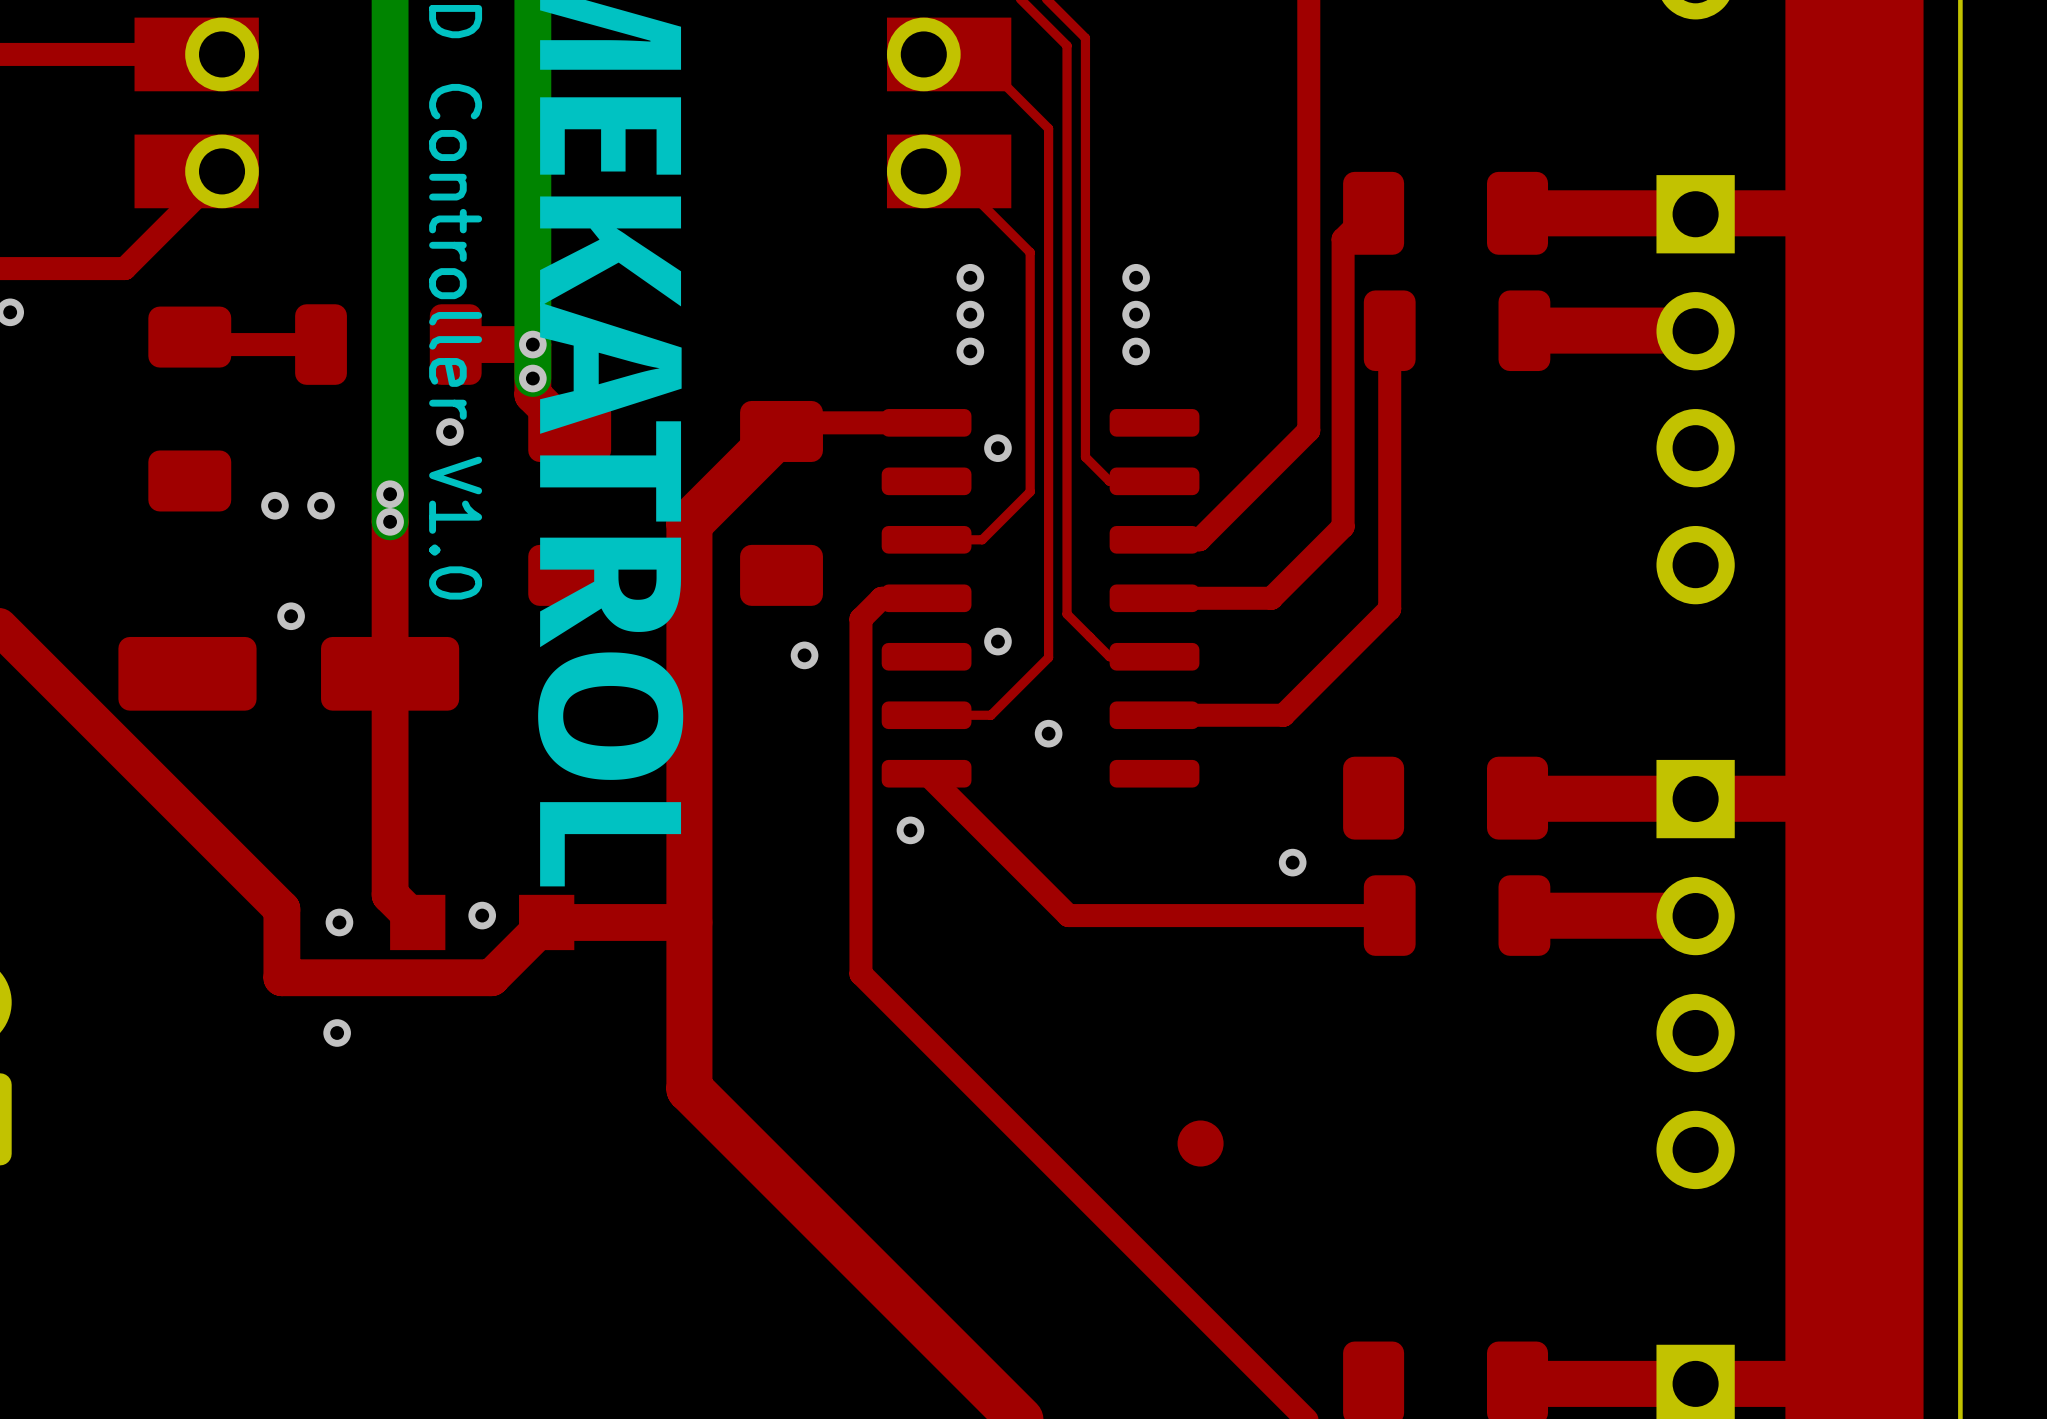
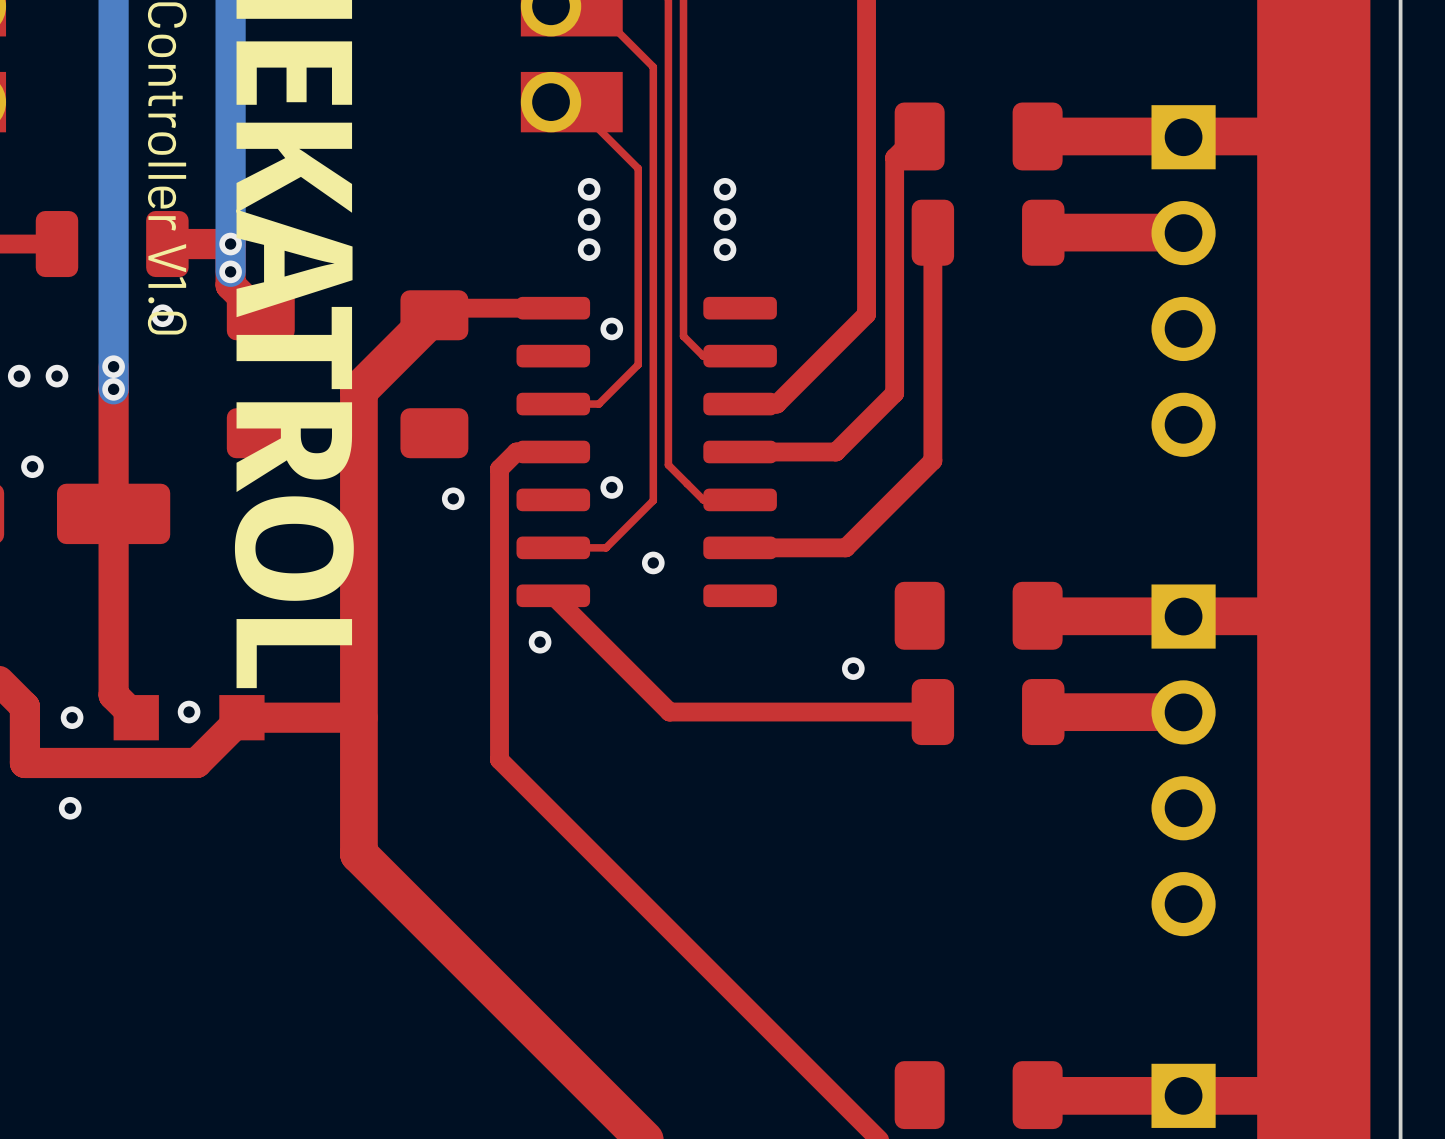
part: (1200, 1143) -> none

